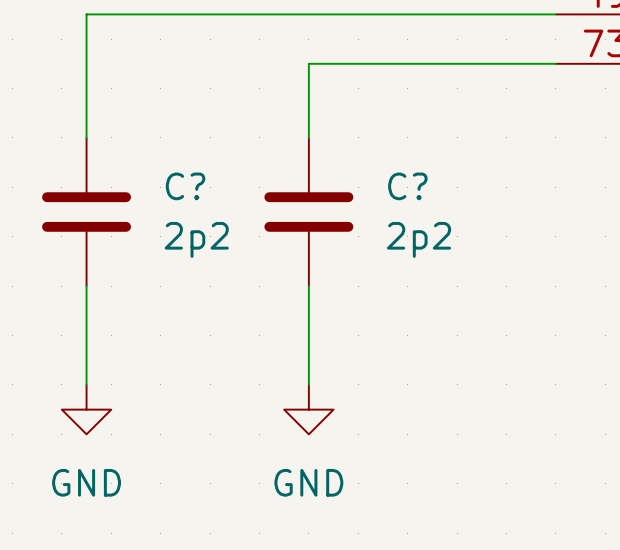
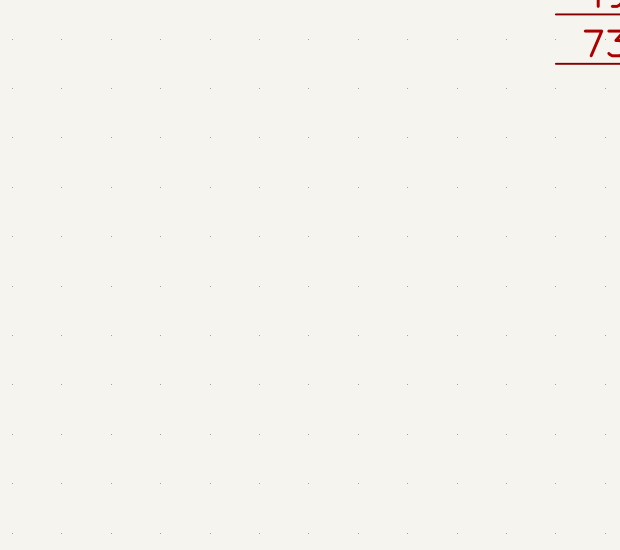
wire: (555, 14) (86, 14) (86, 137) -> none
wire: (555, 63) (308, 63) (308, 137) -> none
C?: 2p2 (86, 212) -> none
C?: 2p2 (308, 212) -> none
wire: (86, 286) (86, 384) -> none
wire: (308, 286) (308, 384) -> none
power symbol: GND (86, 409) -> none
power symbol: GND (308, 409) -> none

